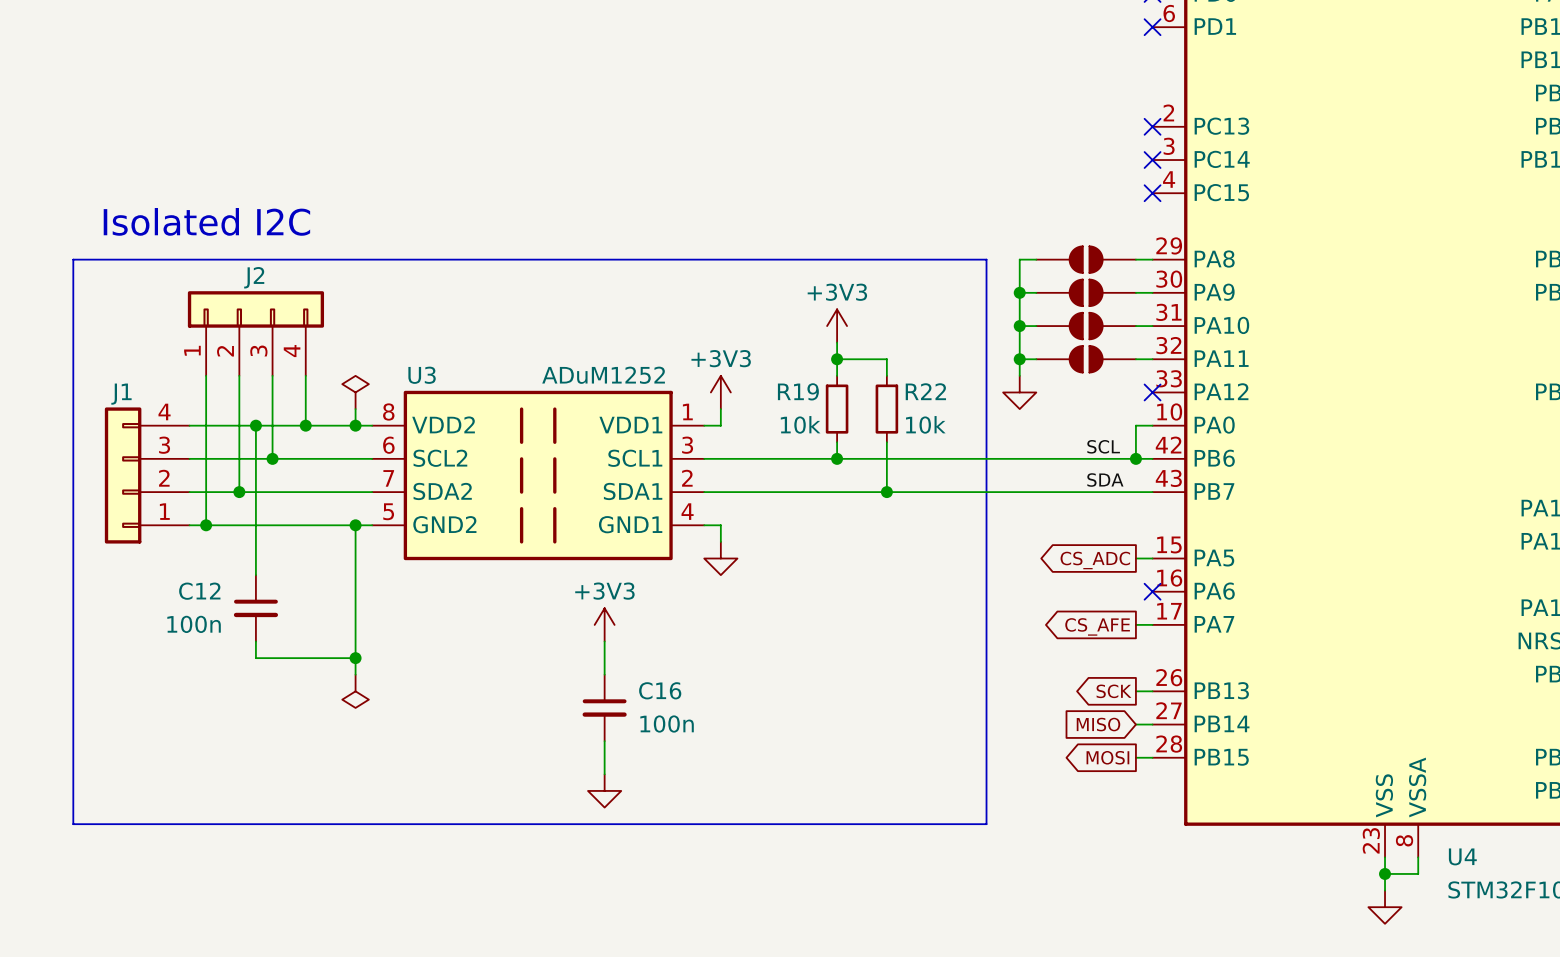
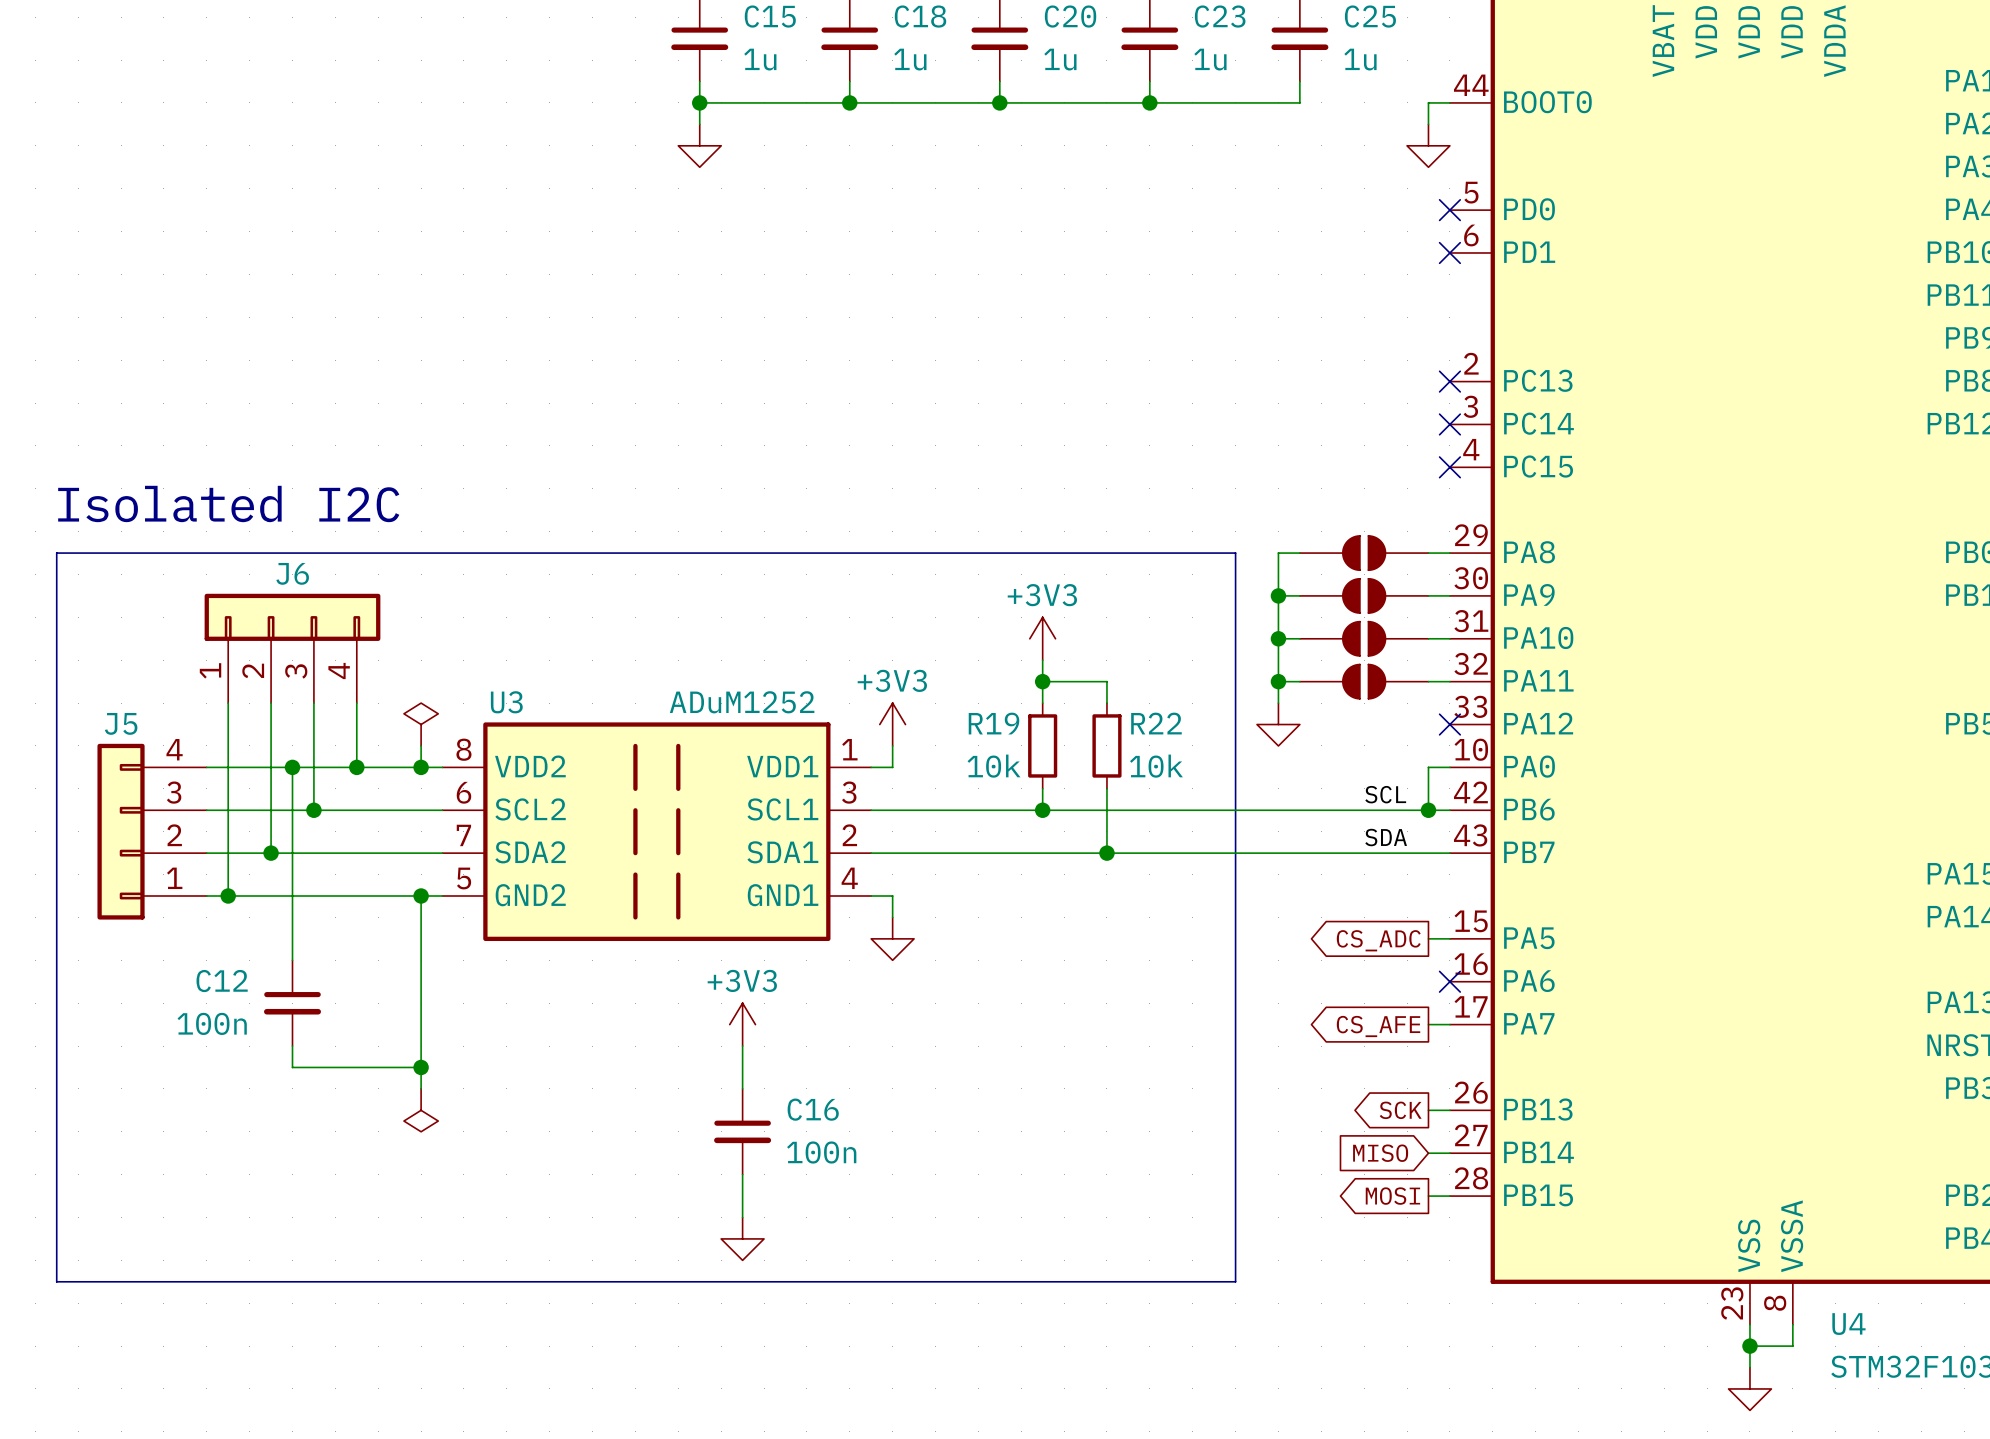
J2 name: J2 (254, 277) -> J6 (292, 573)
J1 name: J1 (121, 394) -> J5 (121, 723)

